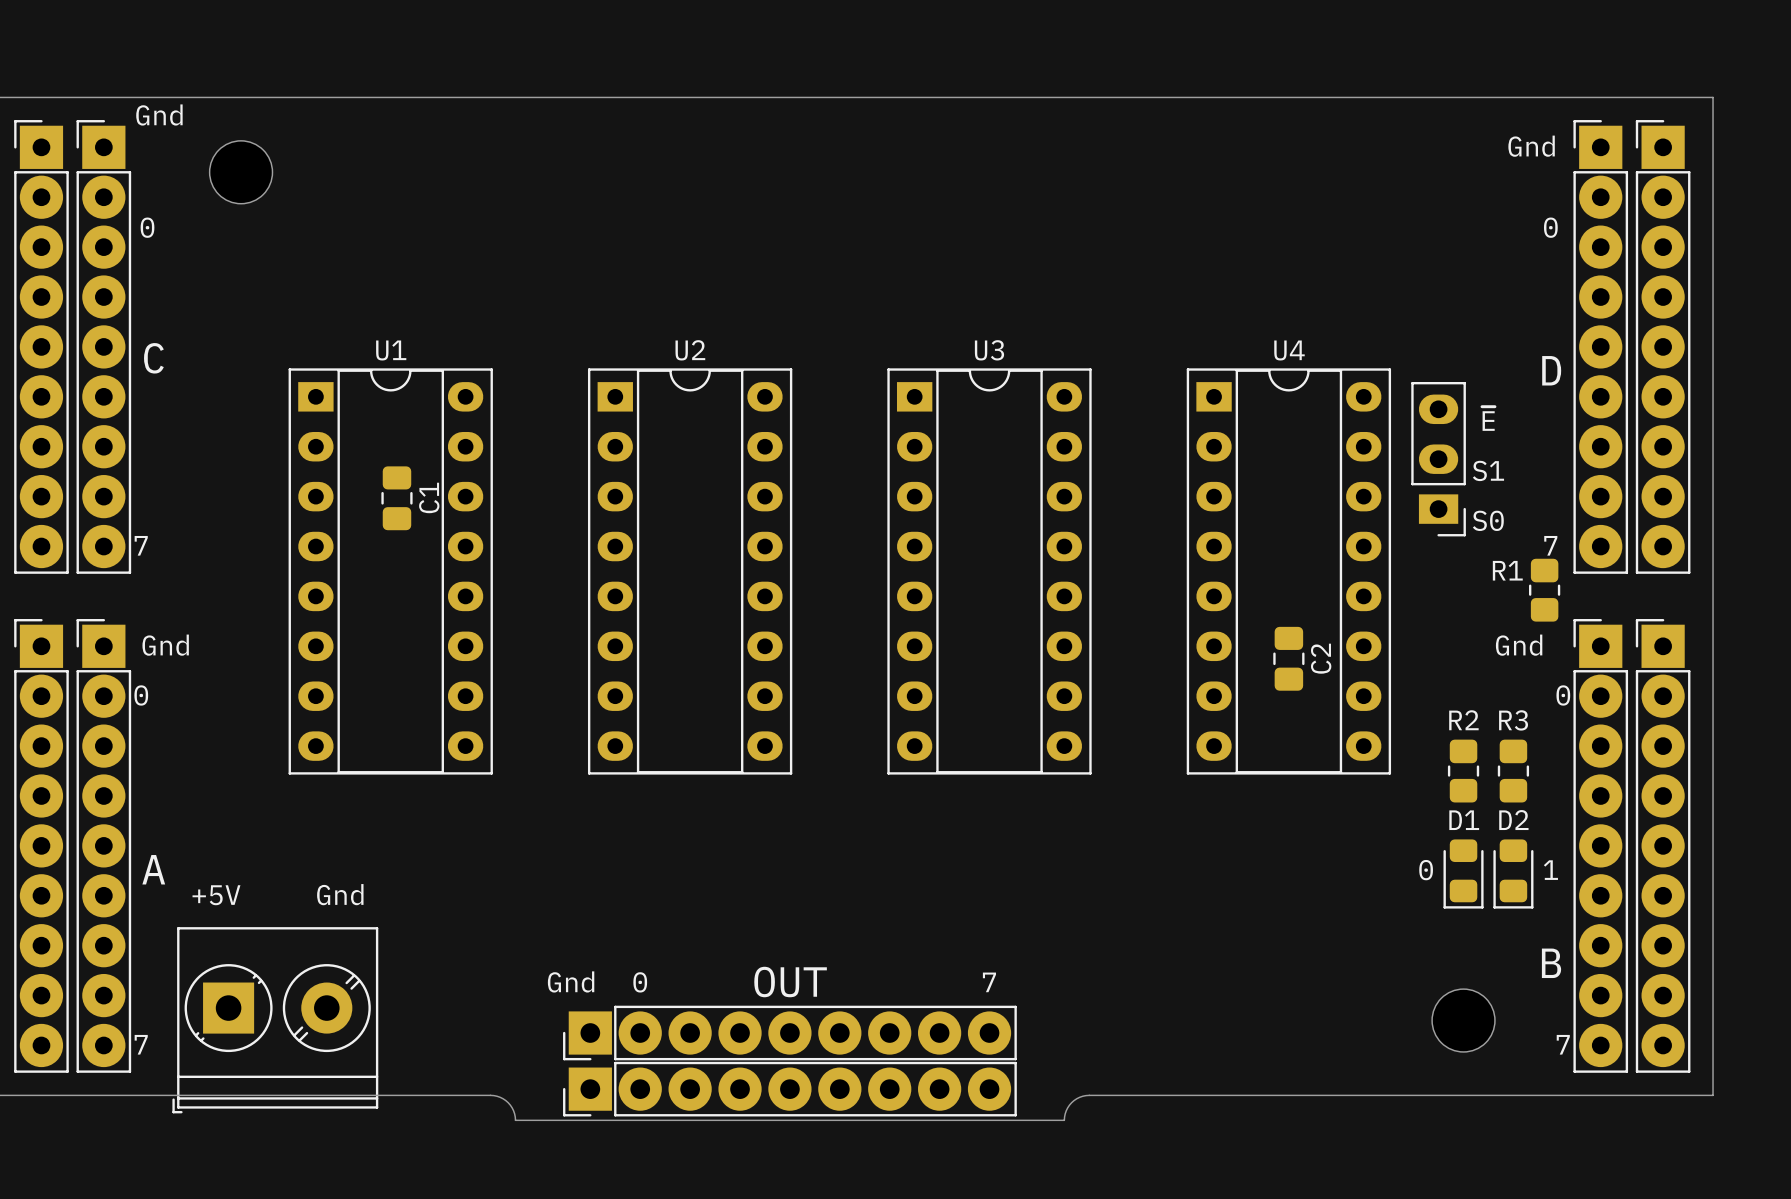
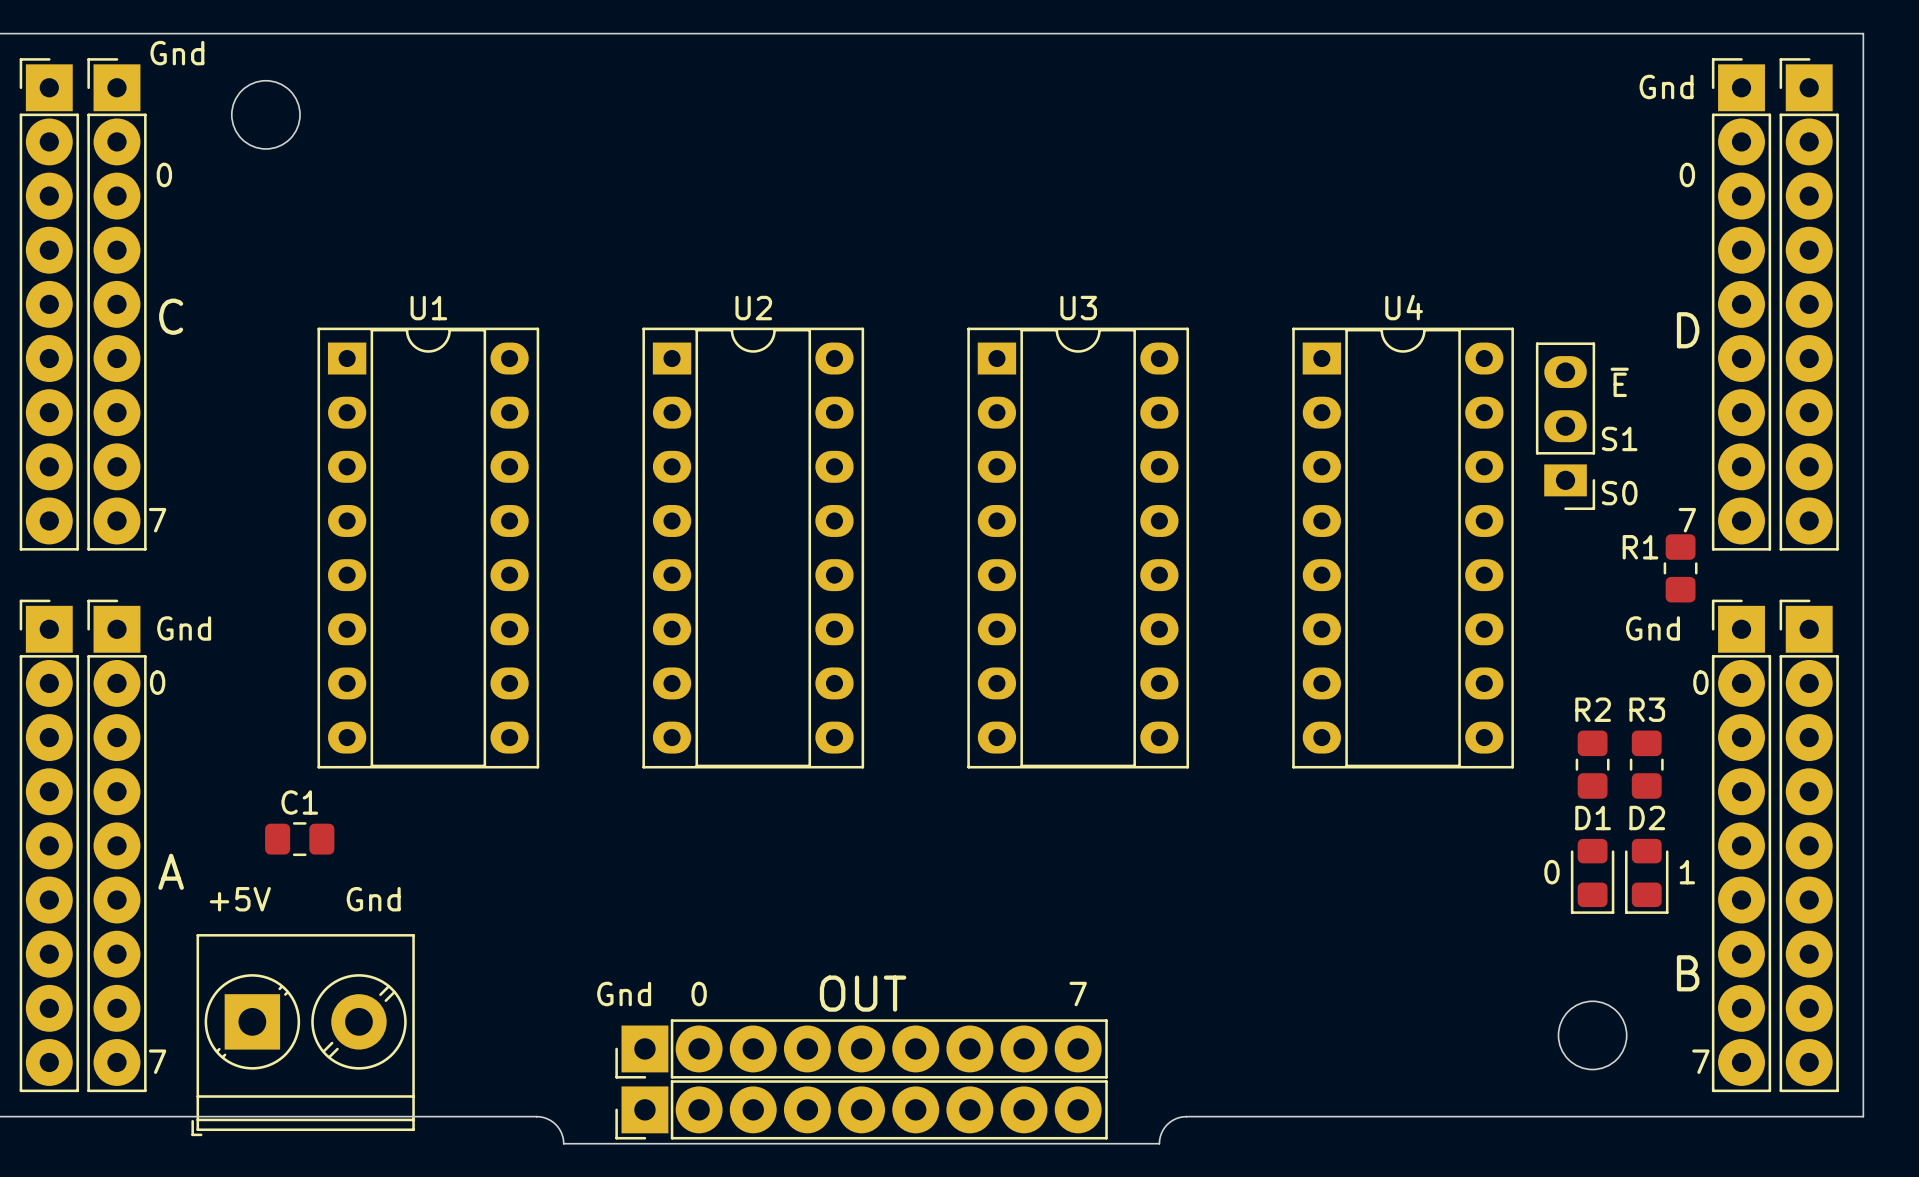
C1 name position: C1 (429, 497) -> C1 (299, 802)
C1 rotation: 0° (396, 498) -> 90° clockwise (299, 839)
C1 position: (396, 498) -> (299, 839)
C2: (1288, 658) -> none

